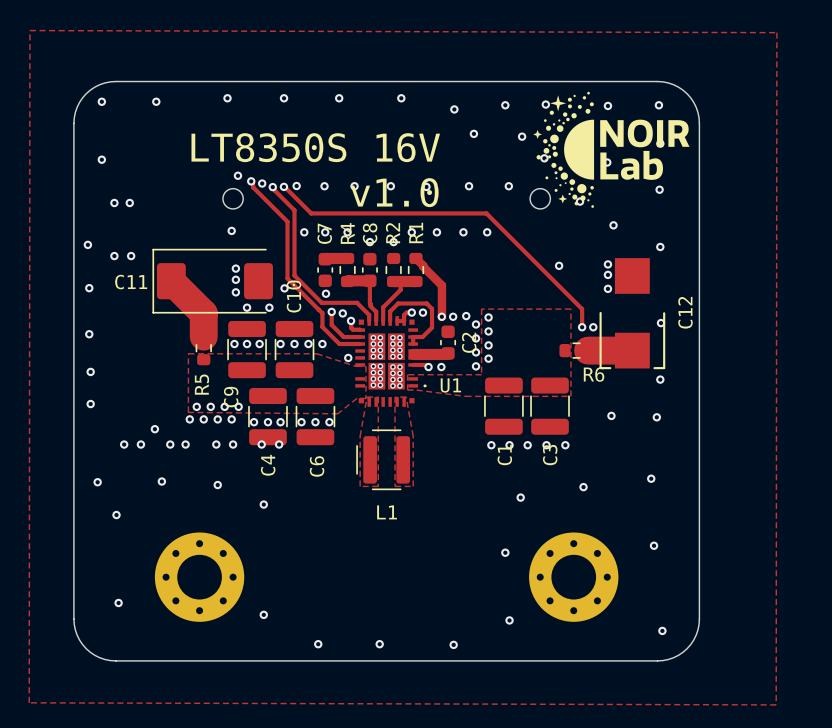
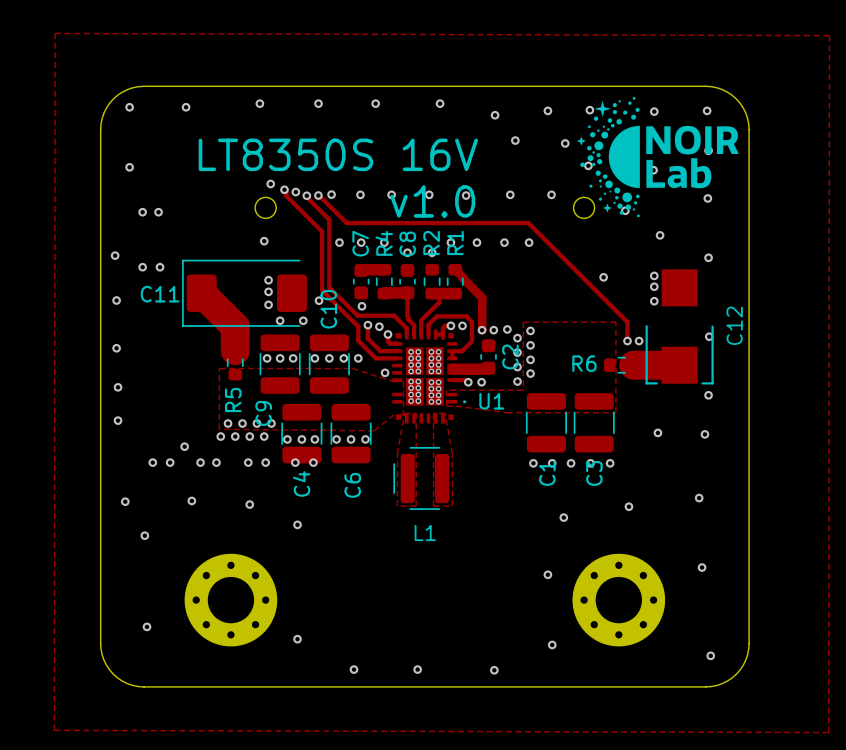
R6 name position: R6 (594, 374) -> R6 (584, 363)

